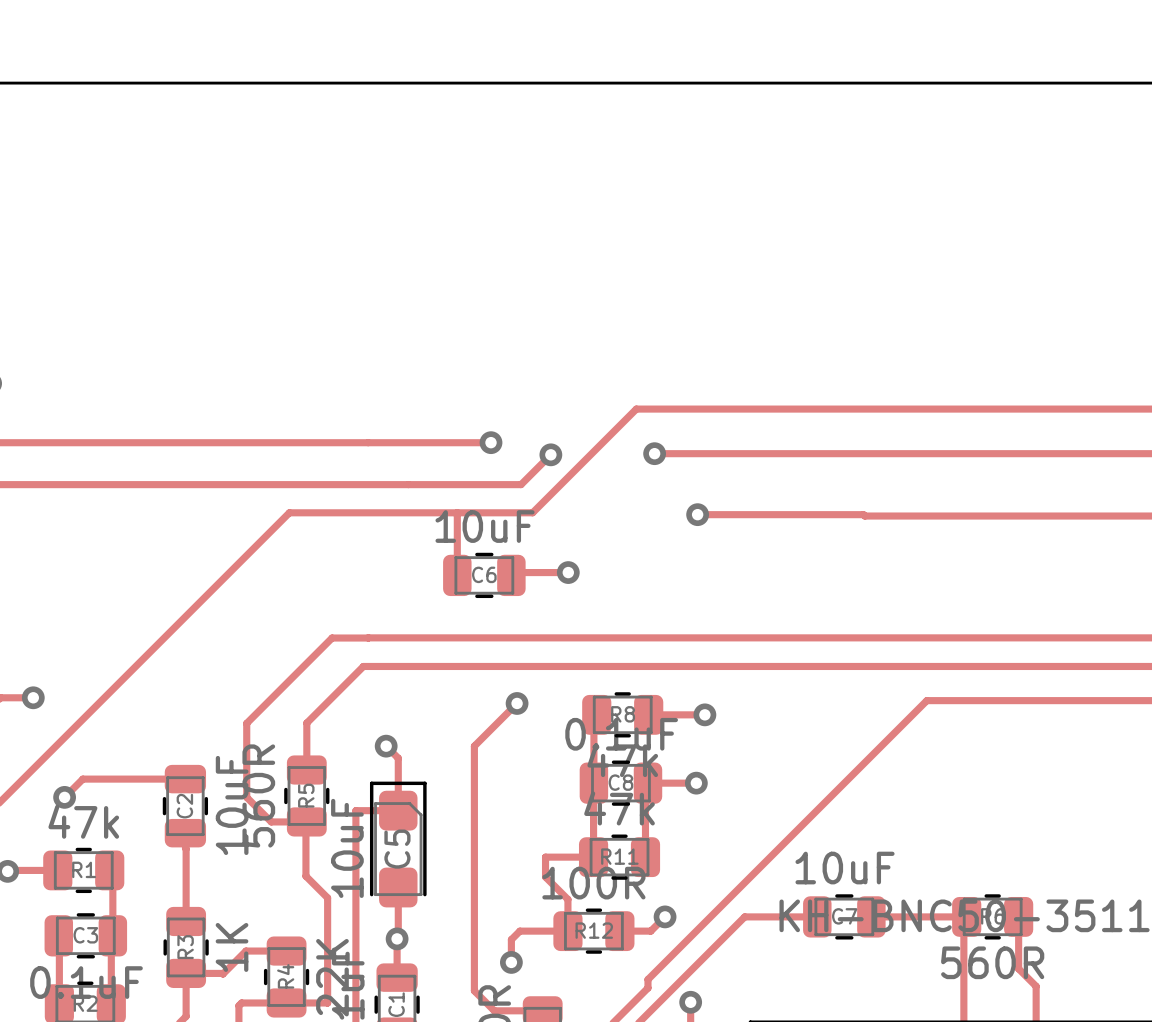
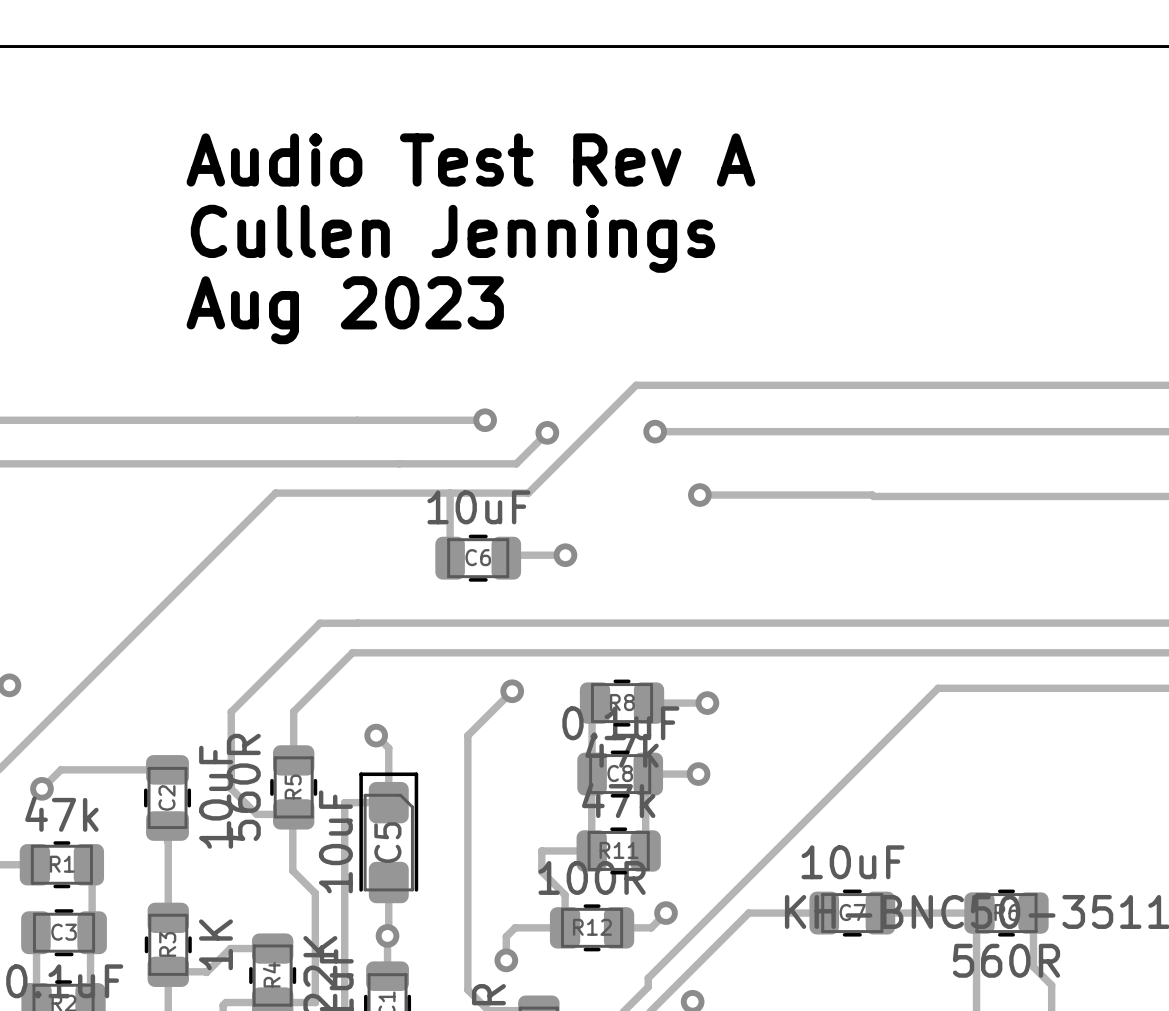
text: none -> Audio Test Rev A (470, 159)
text: none -> Cullen Jennings (452, 238)
text: none -> Aug 2023 (345, 310)

